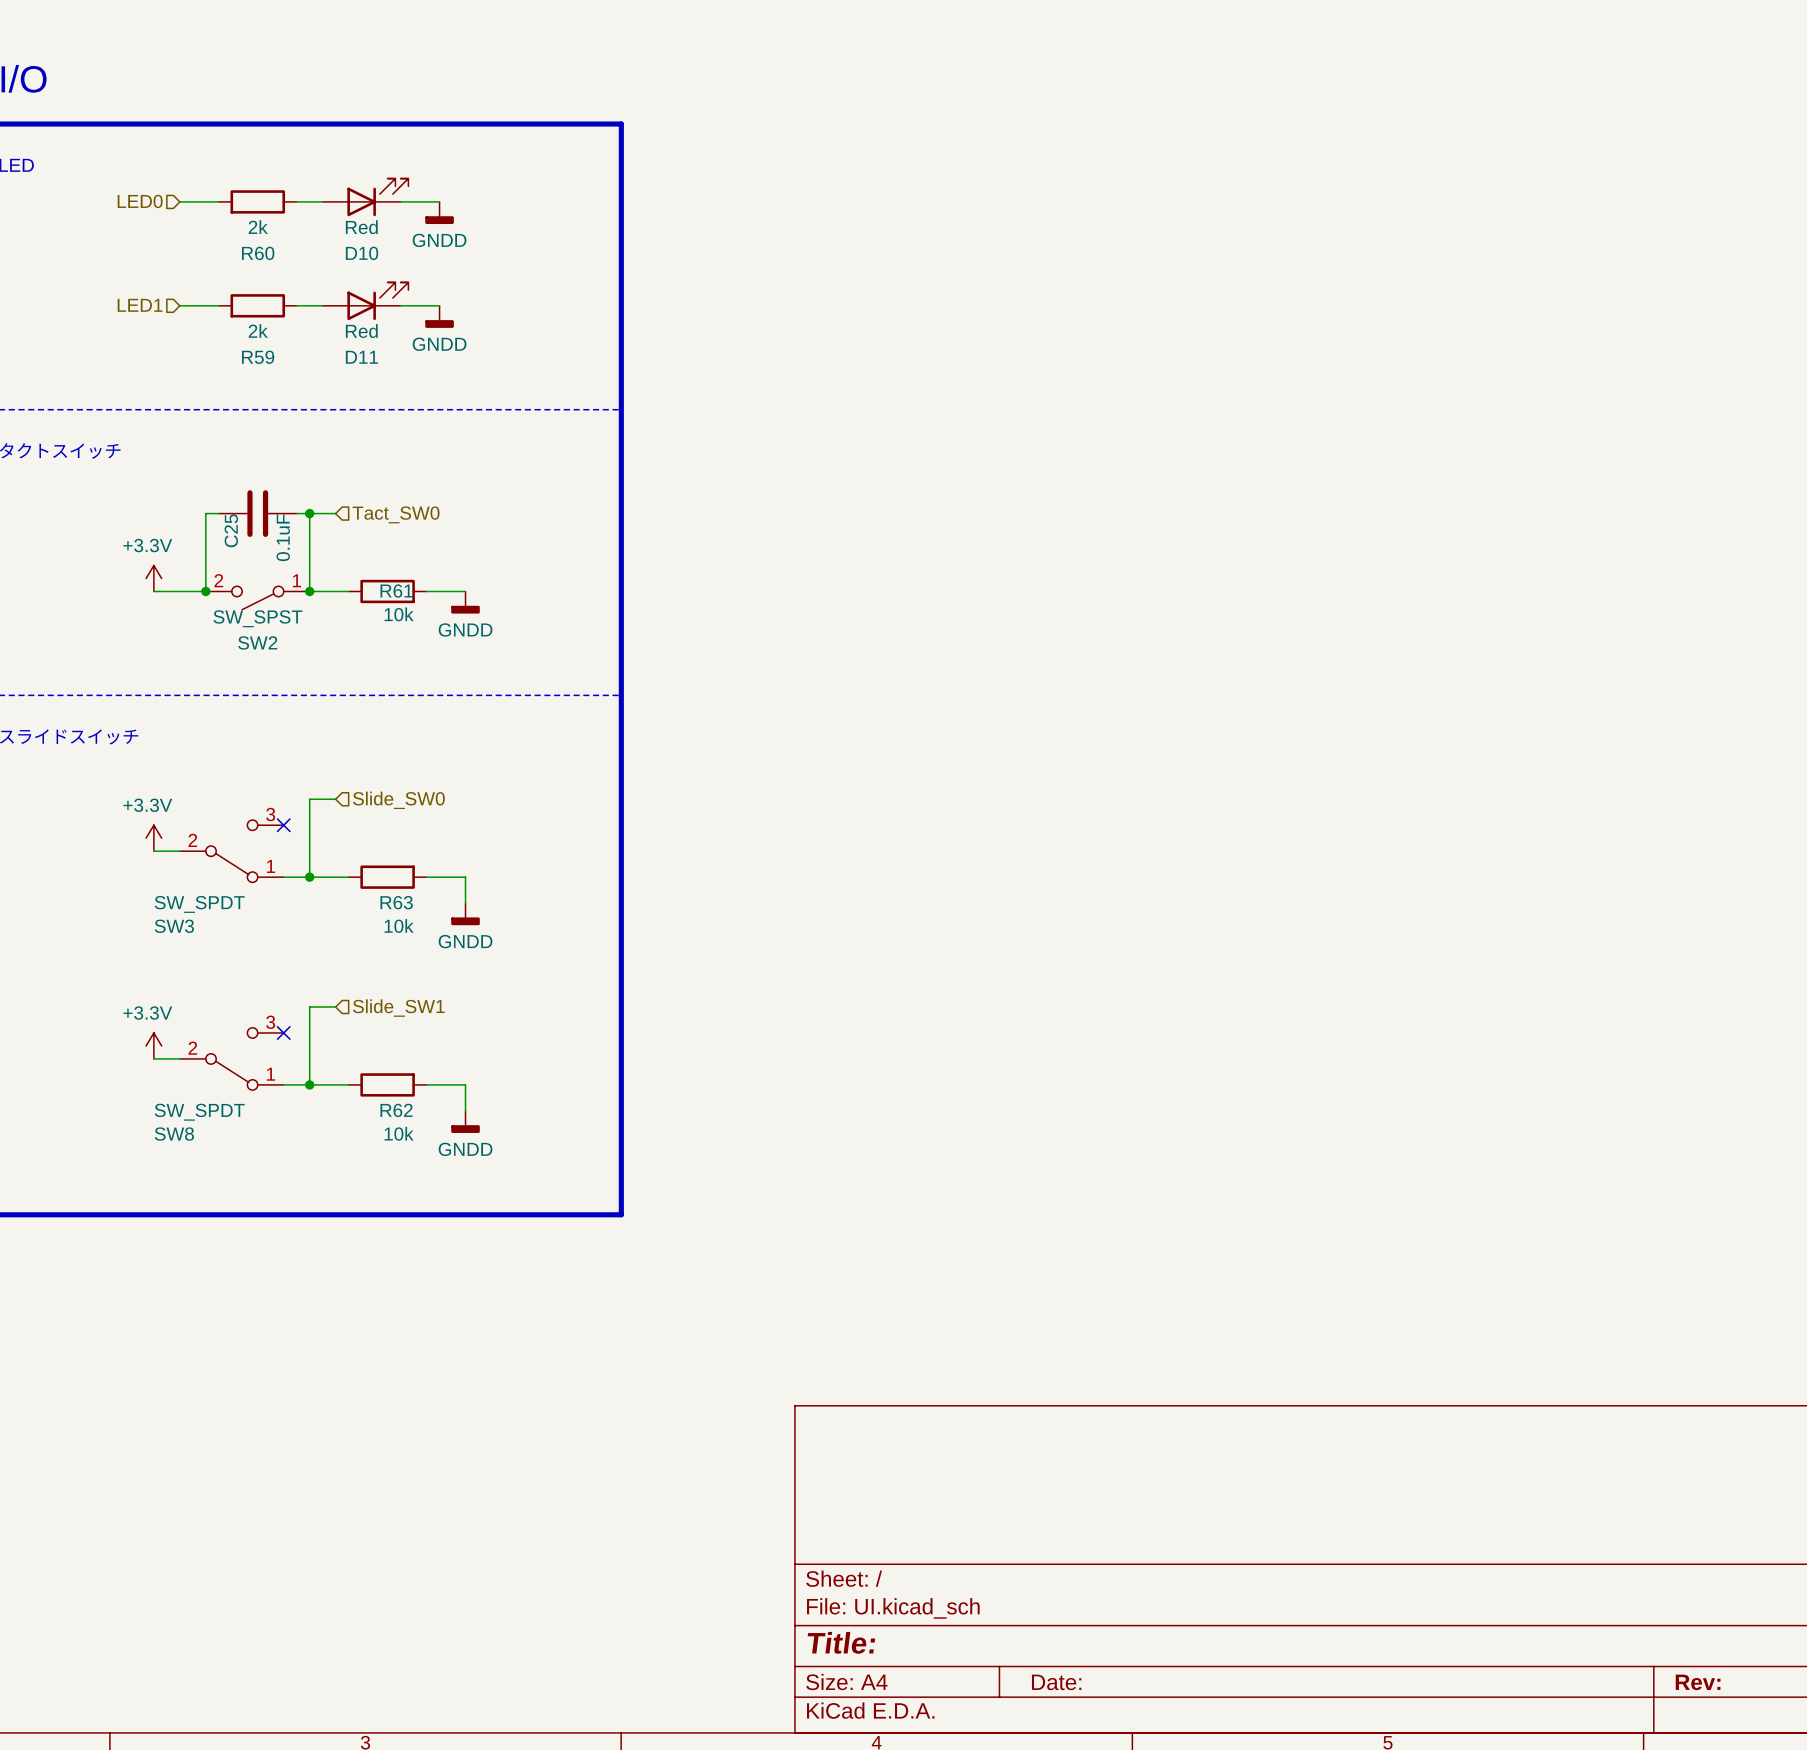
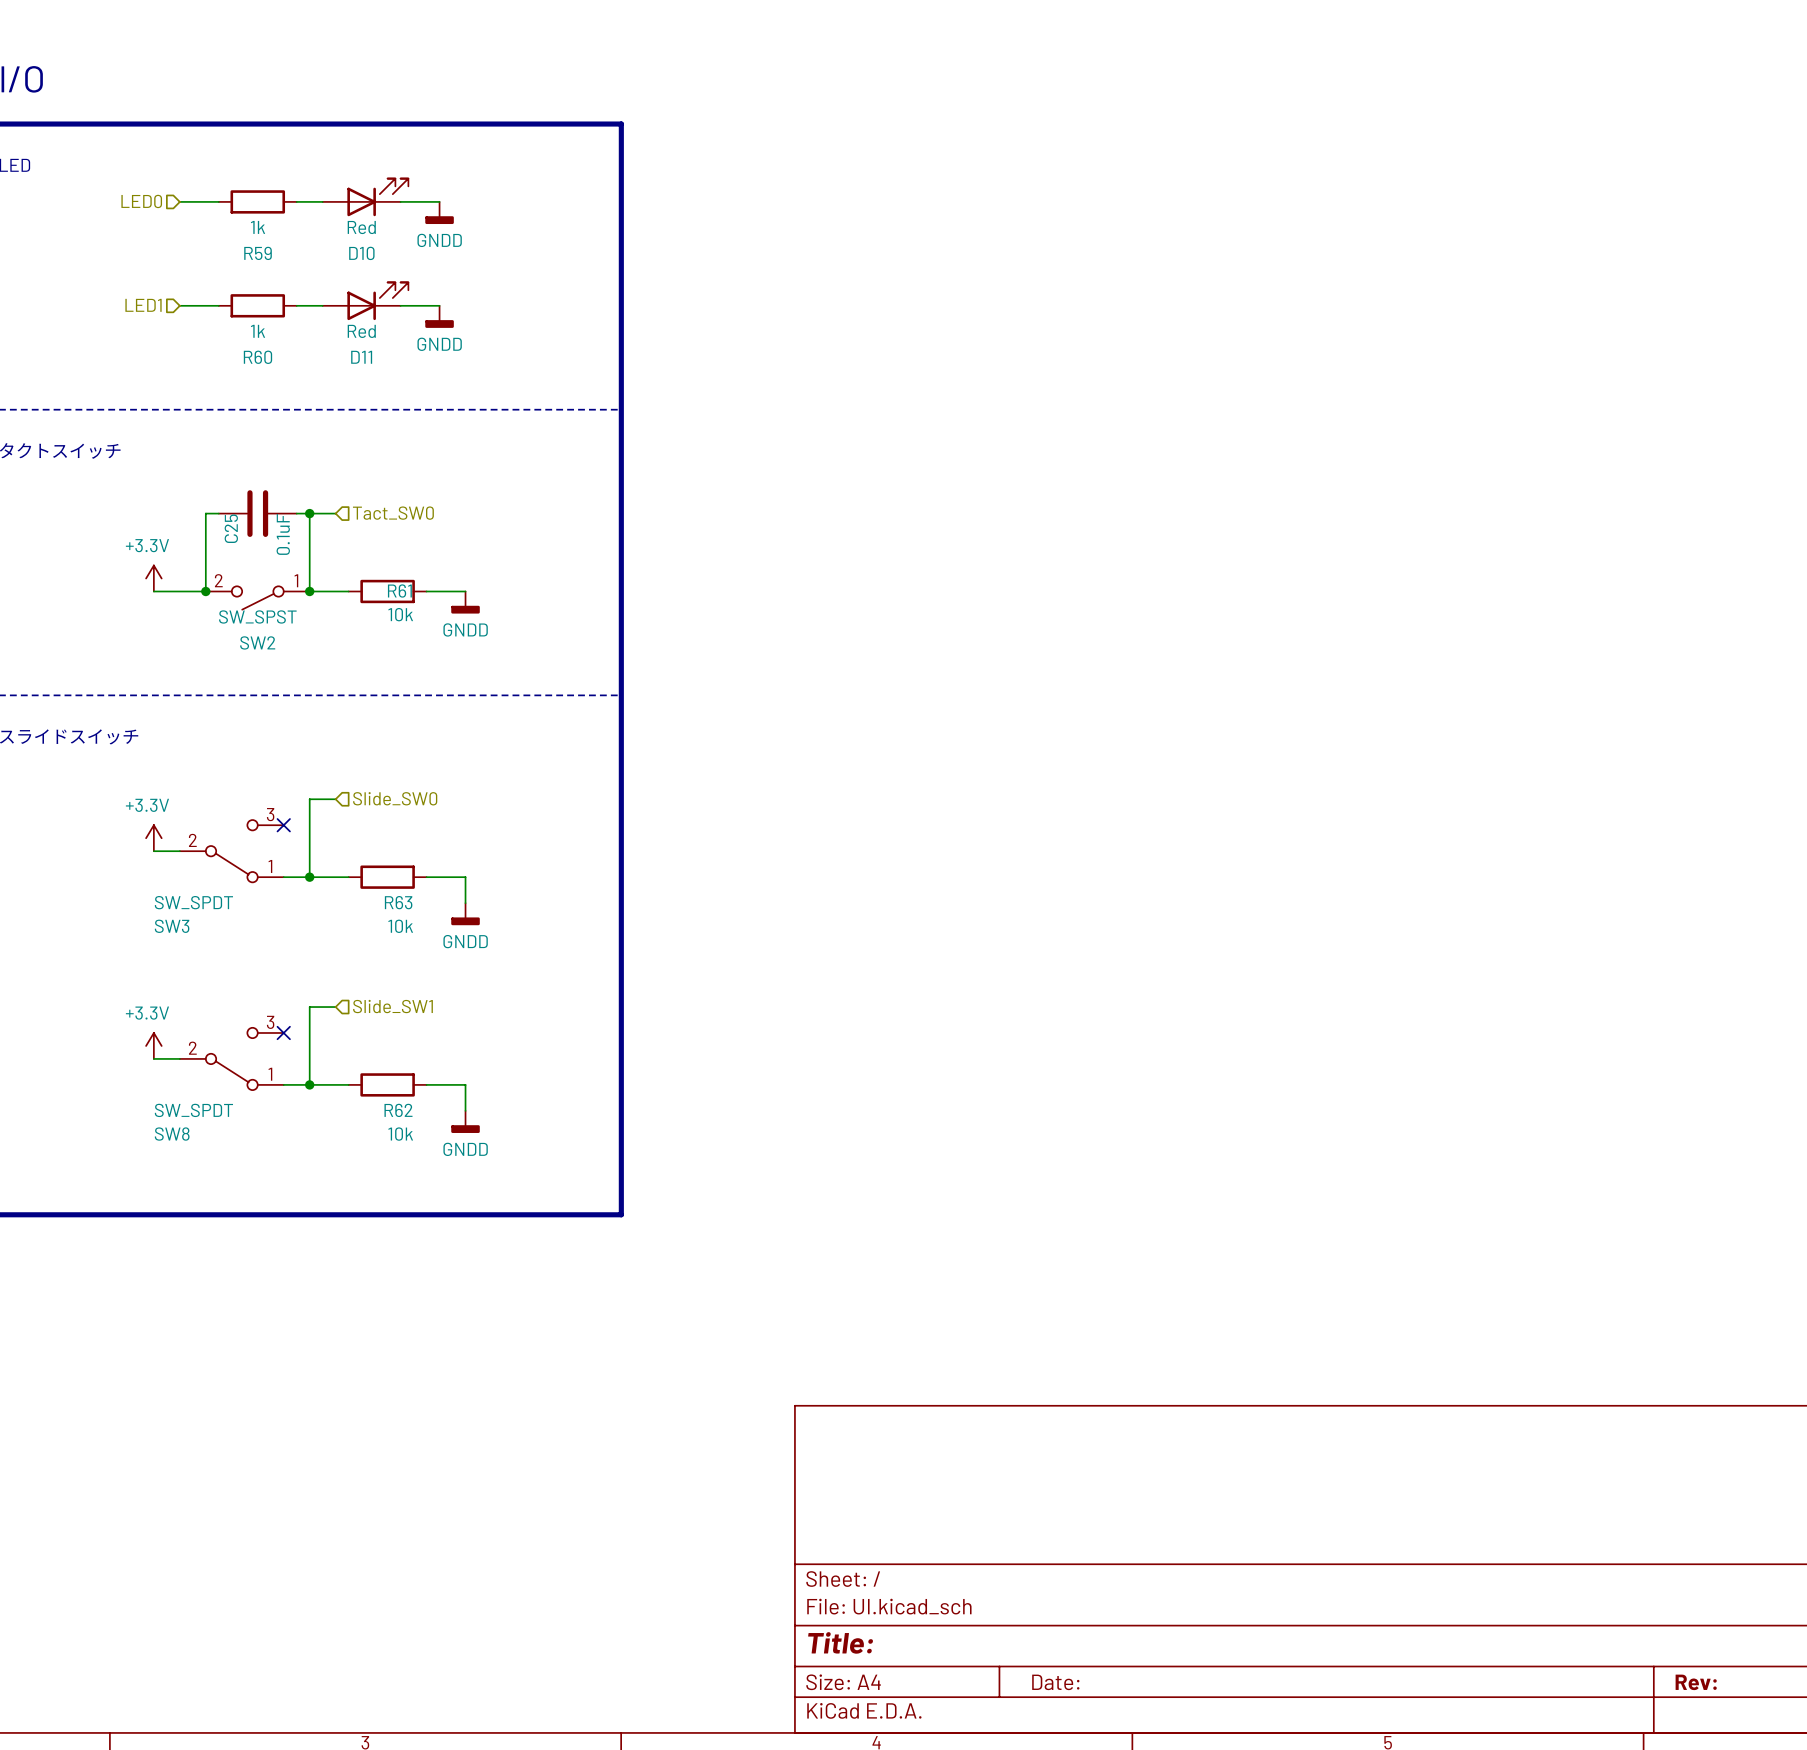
R60 value: 2k (258, 227) -> 1k (258, 227)
R60 name: R60 (258, 253) -> R59 (258, 253)
R59 value: 2k (258, 330) -> 1k (258, 331)
R59 name: R59 (258, 357) -> R60 (257, 357)

